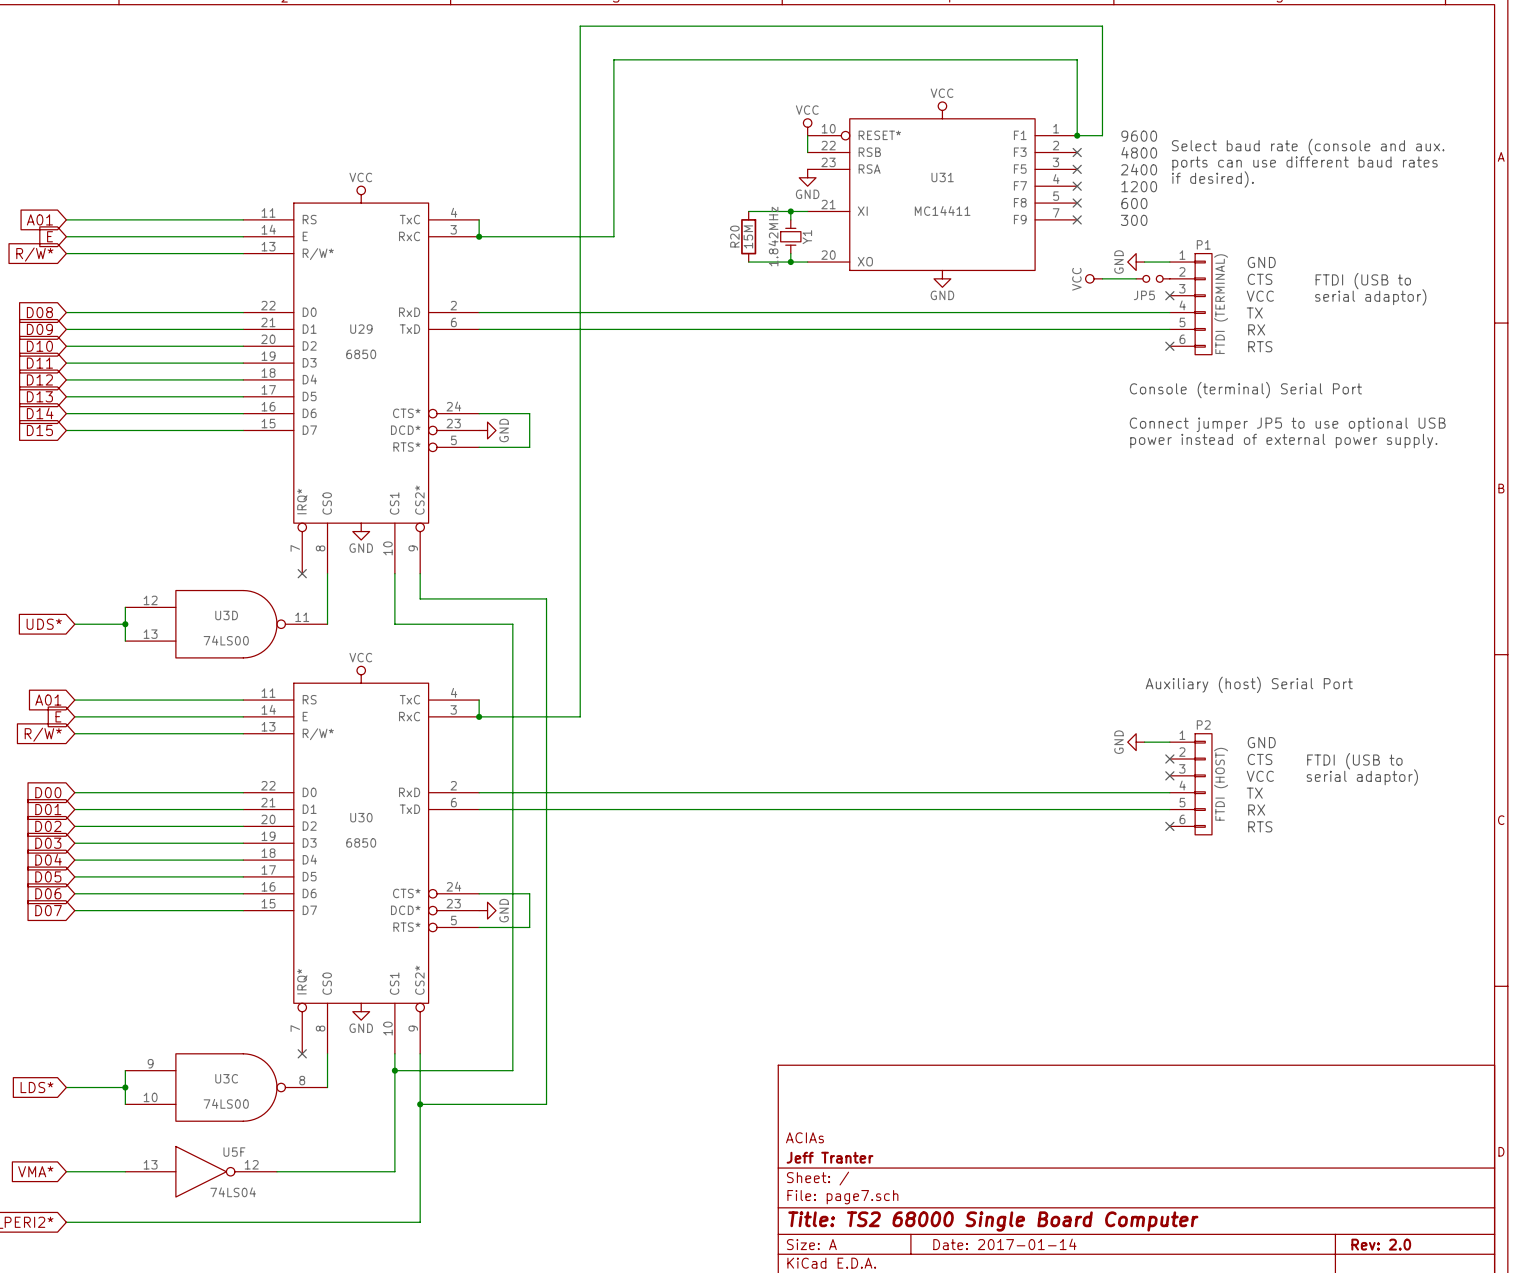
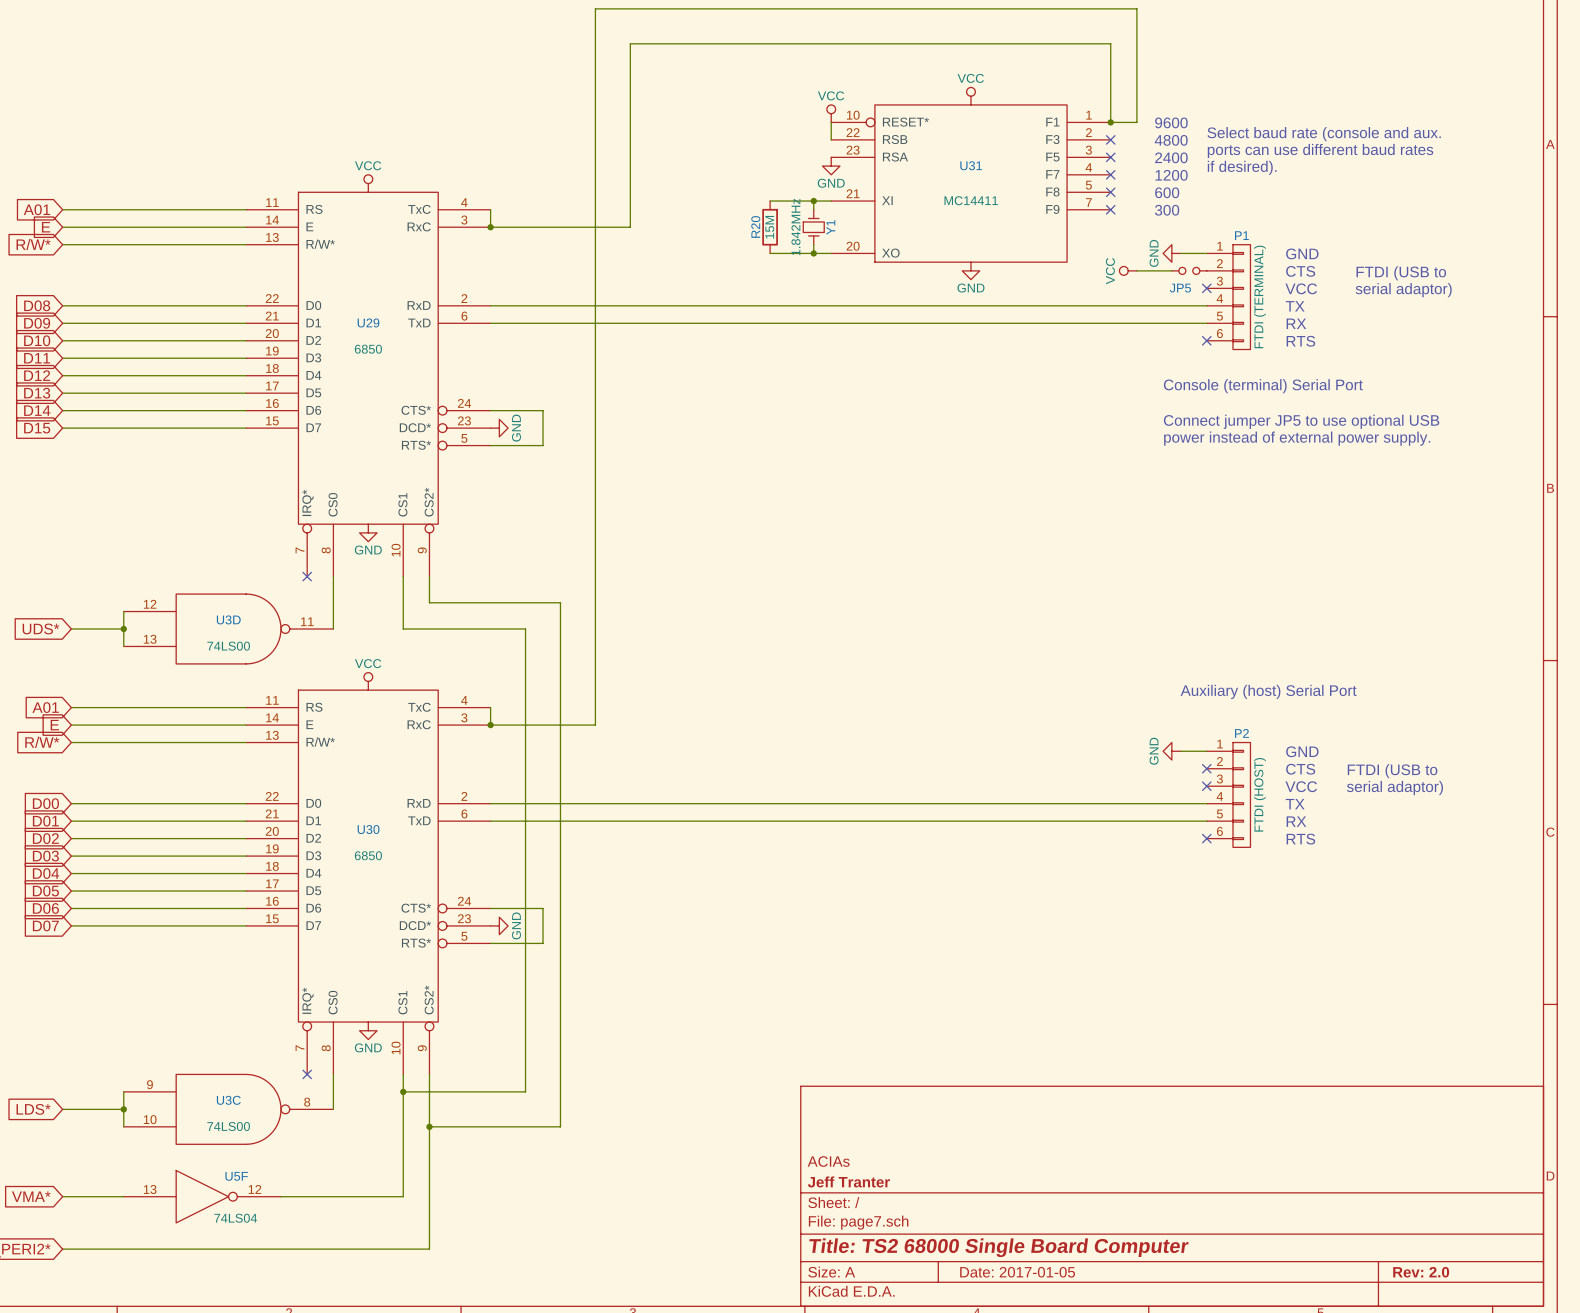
title block: Date: 2017-01-14 (1004, 1244) -> Date: 2017-01-05 (1017, 1272)

